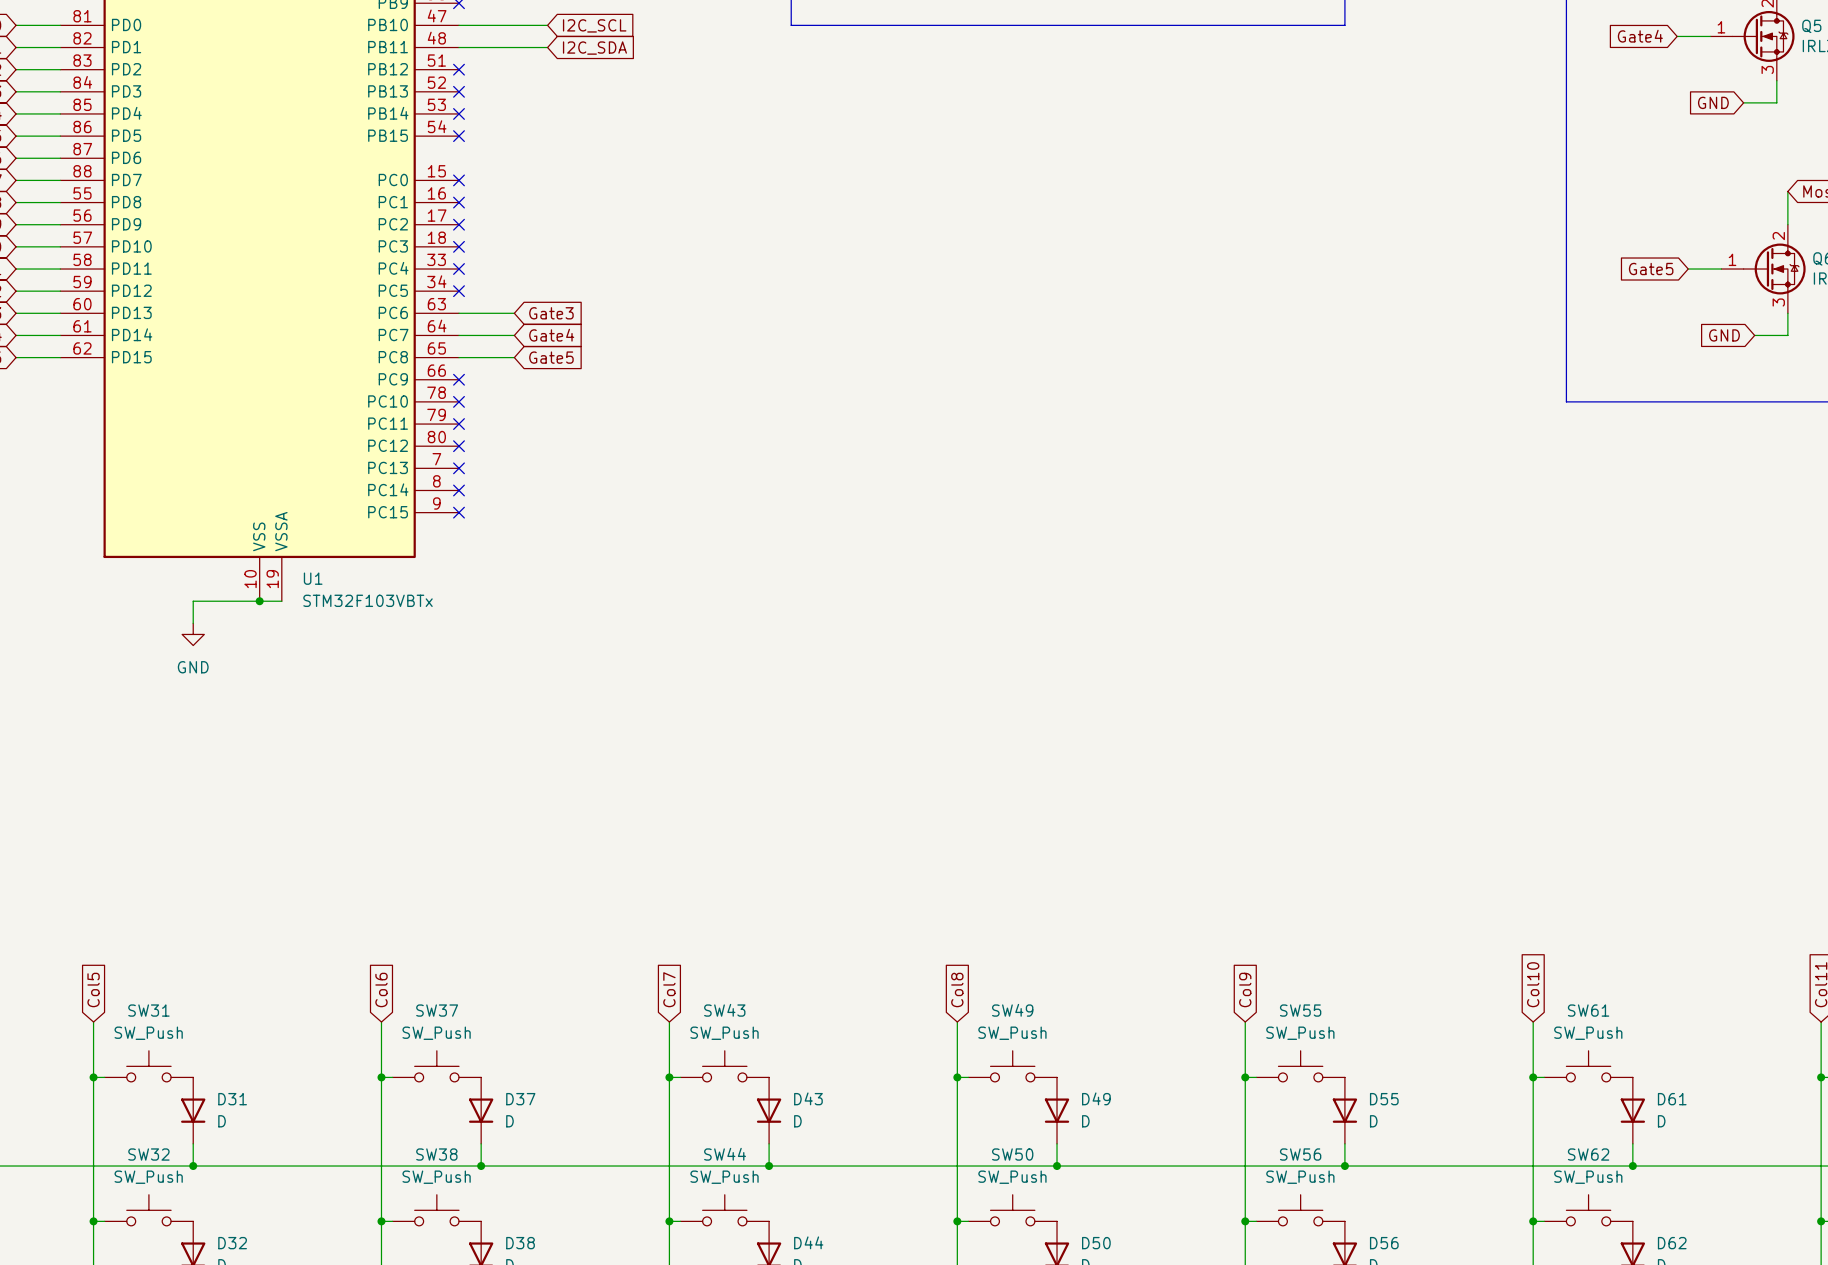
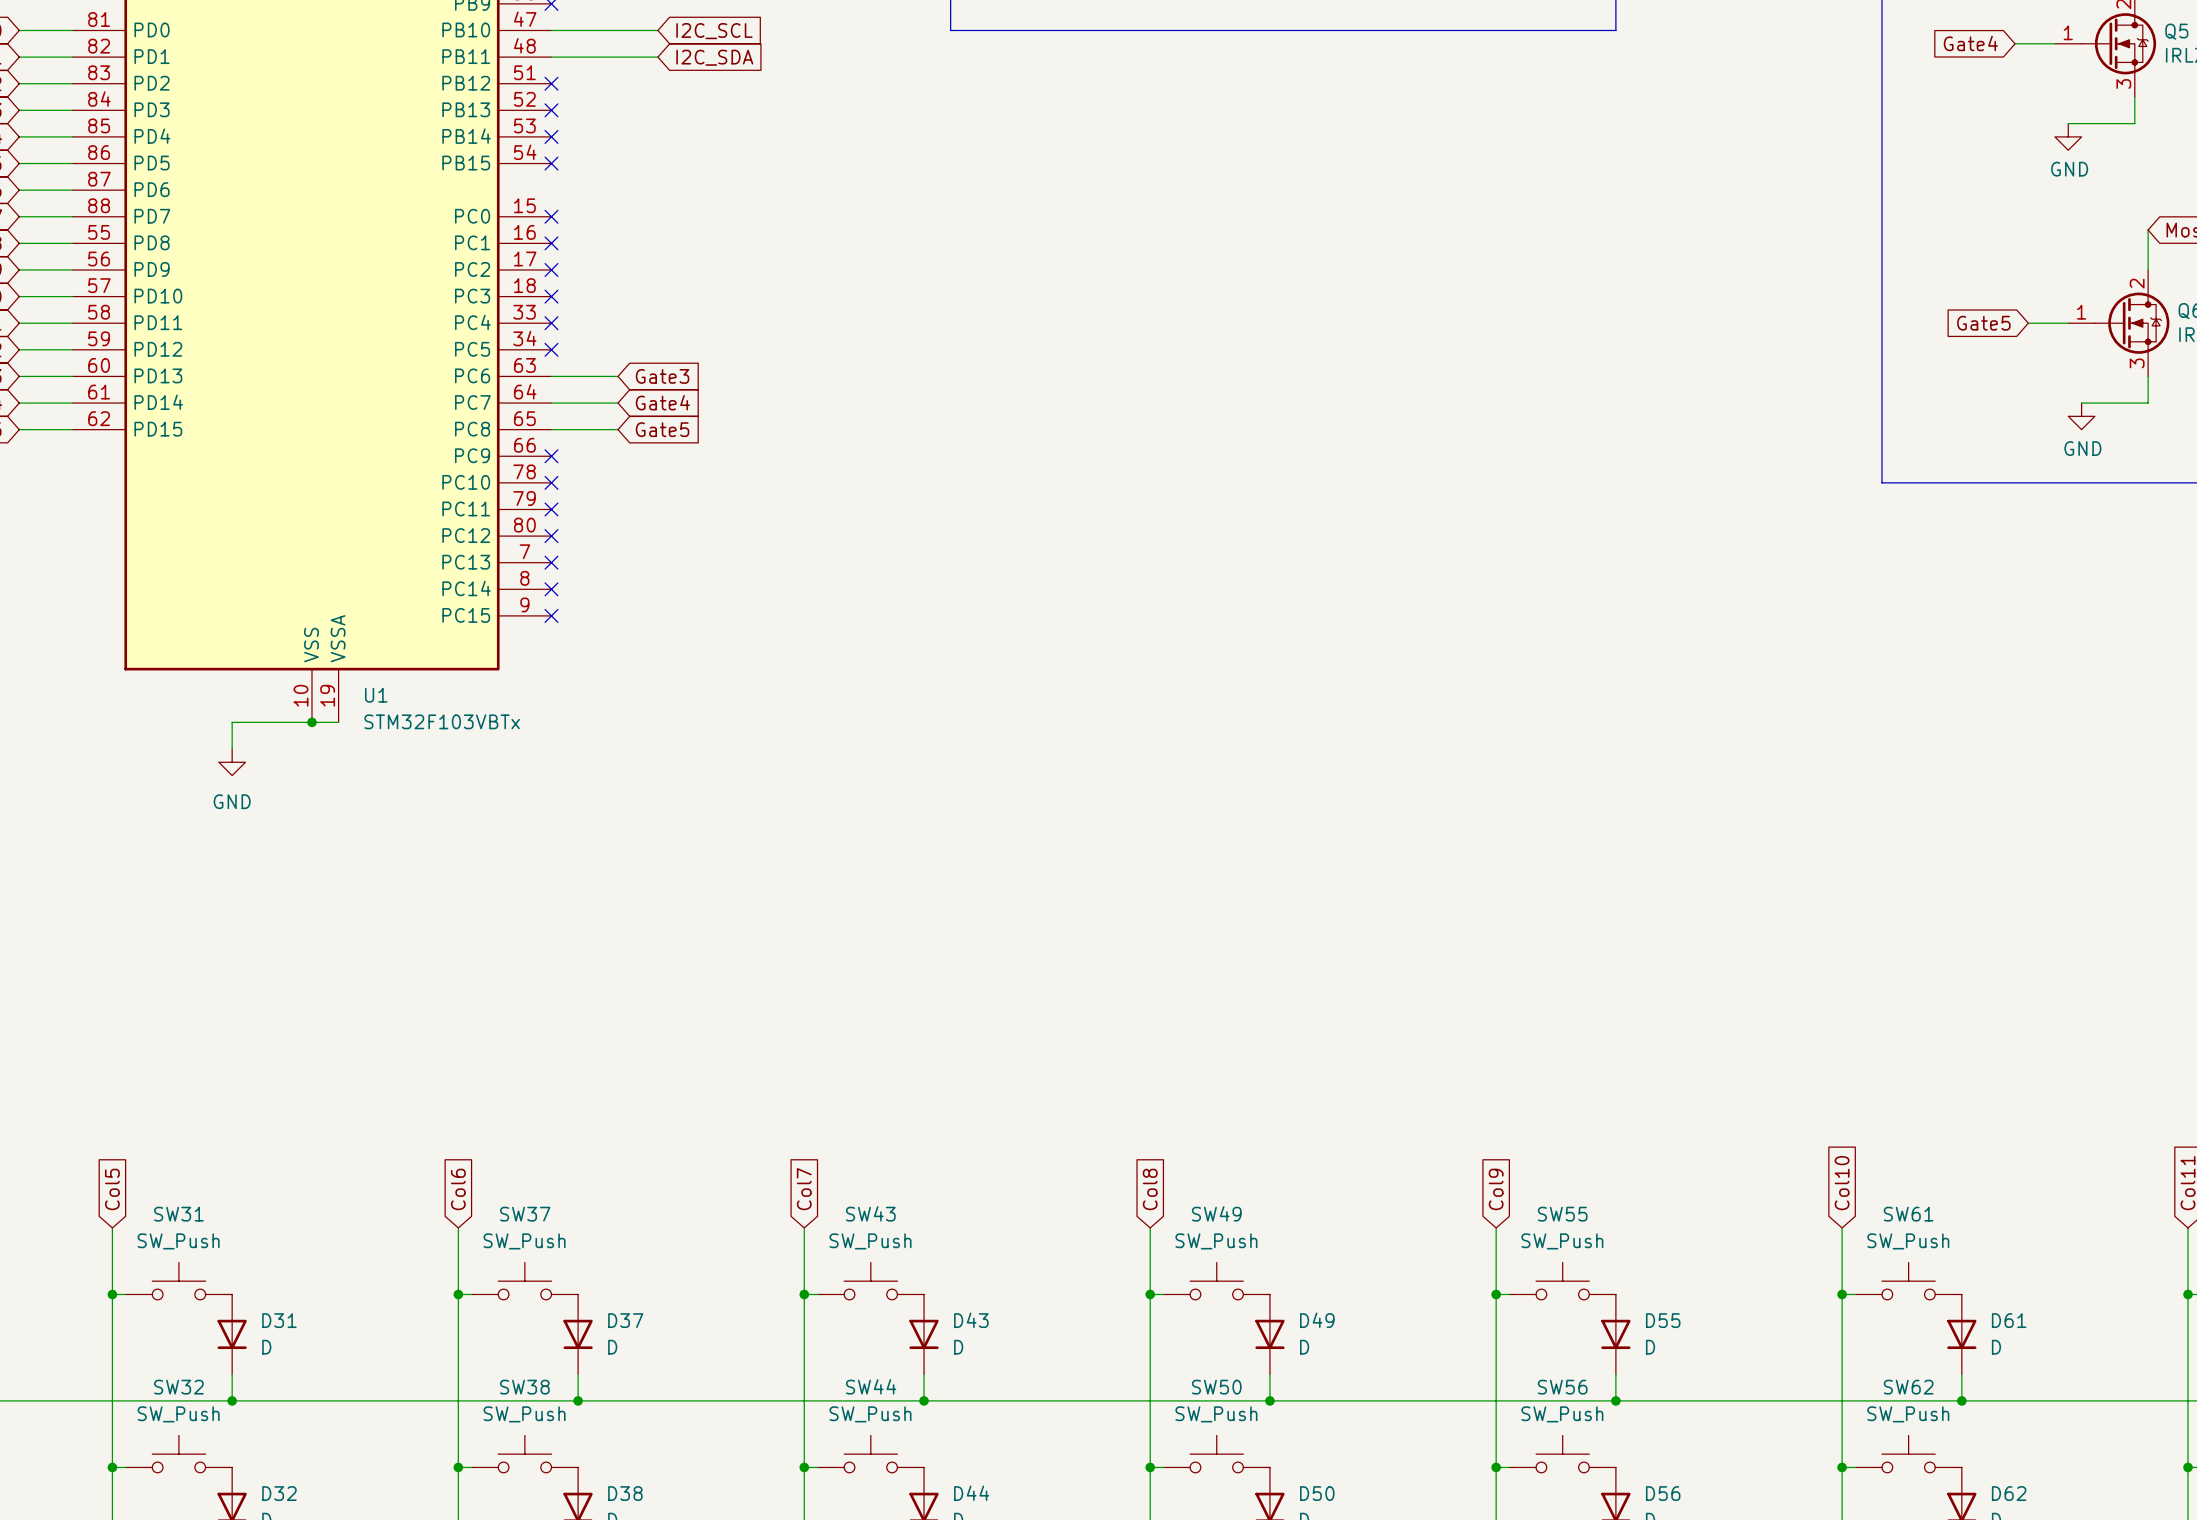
global label: GND (1713, 102) -> none
wire: none -> (2068, 123) (2094, 123)
power symbol: none -> GND (2068, 136)
global label: GND (1724, 335) -> none
wire: none -> (2081, 403) (2108, 403)
power symbol: none -> GND (2081, 416)

